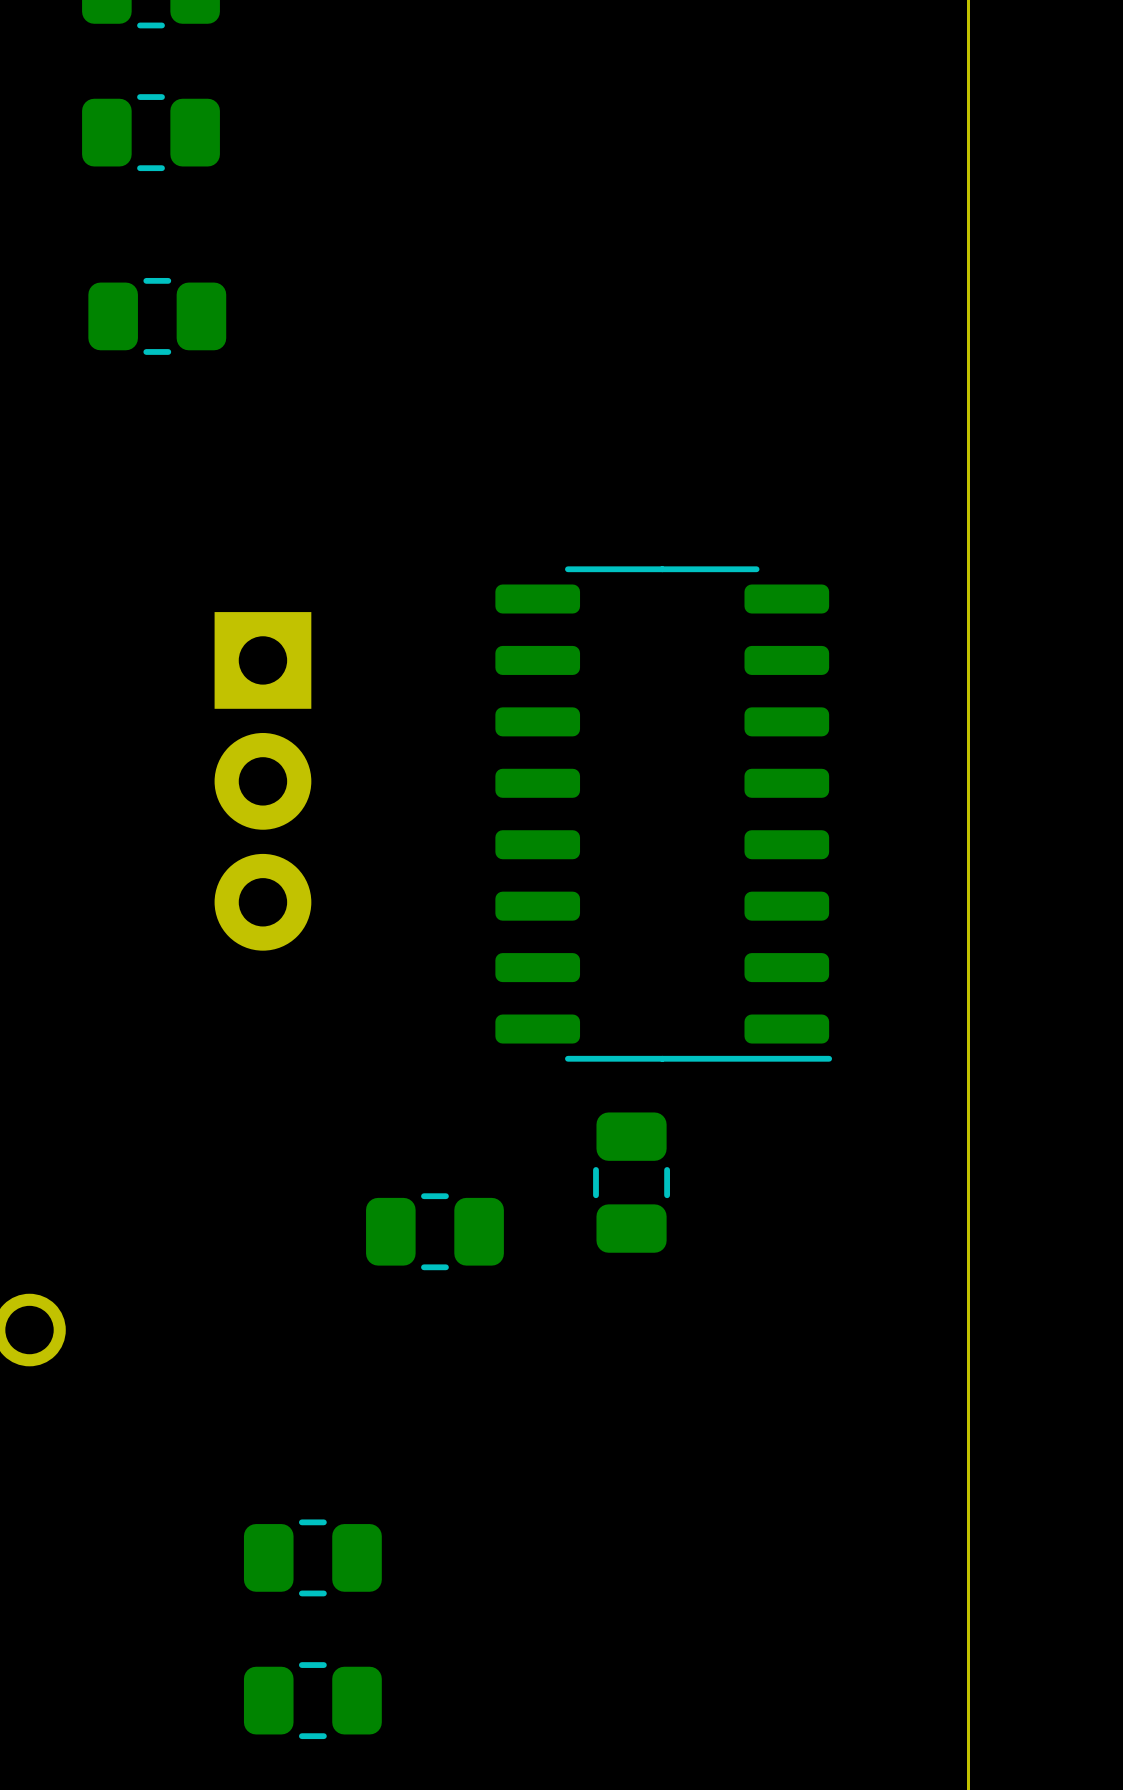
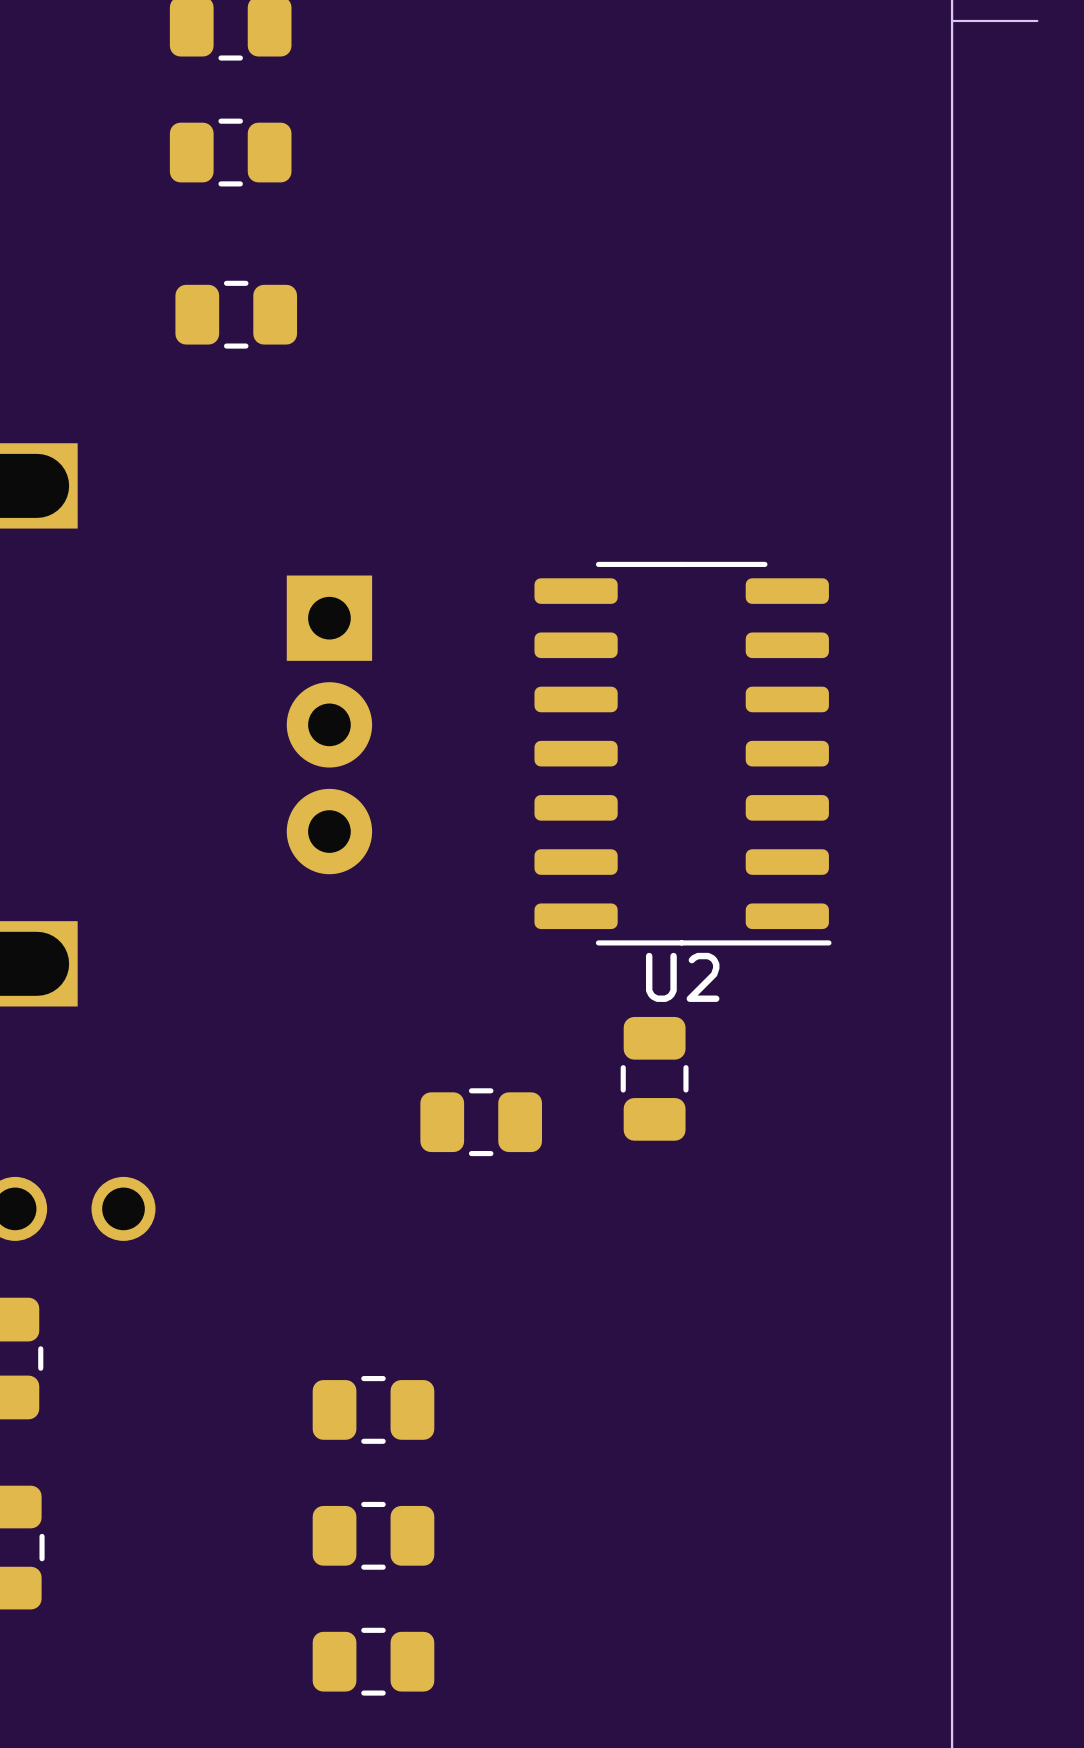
part: (663, 814) -> none
U2: none -> (682, 753)

